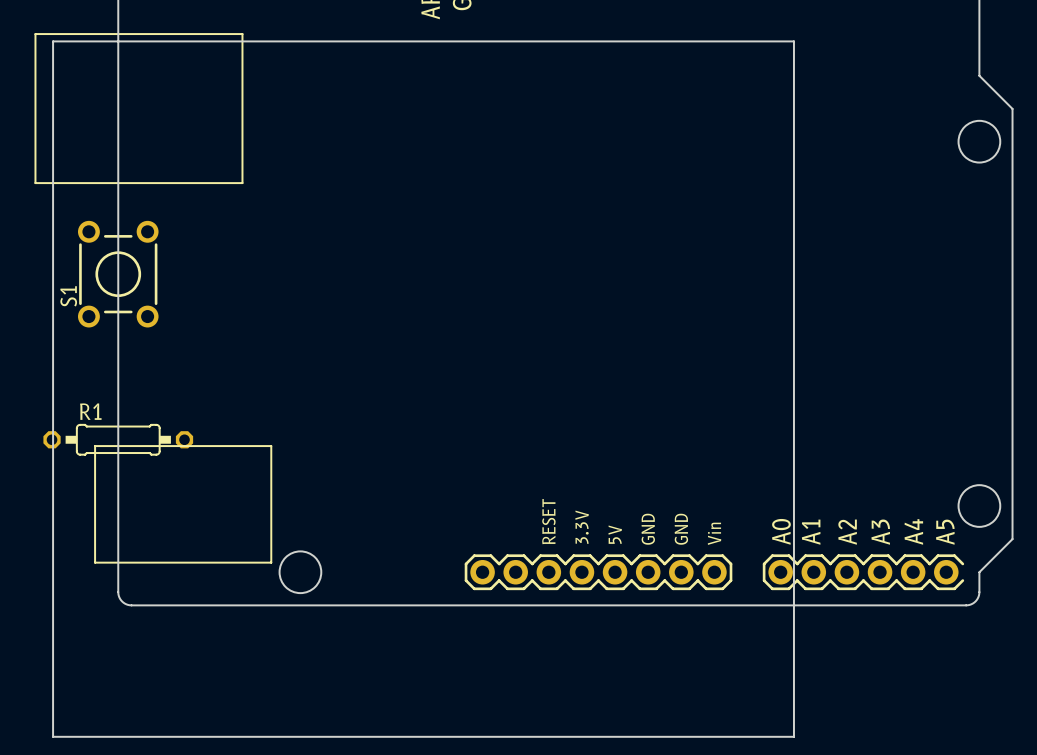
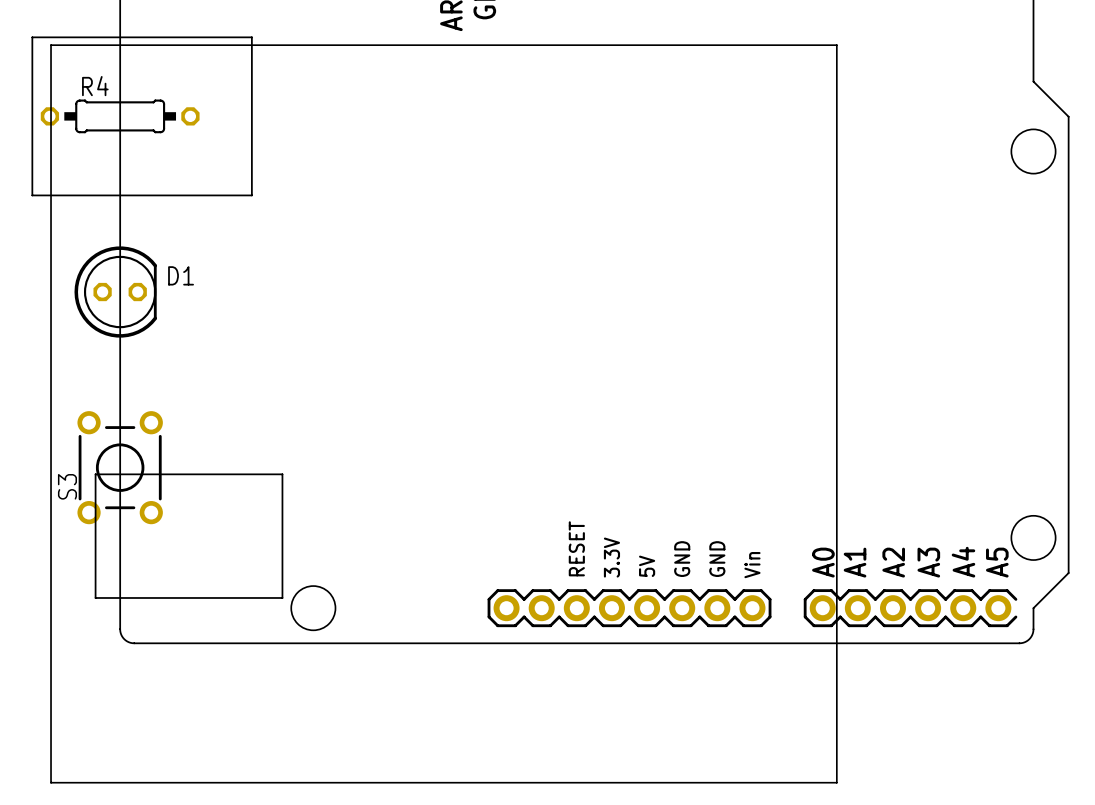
R4: none -> (120, 116)
D1: none -> (115, 292)
S1: (118, 274) -> none
R1: (118, 439) -> none
S3: none -> (120, 467)

